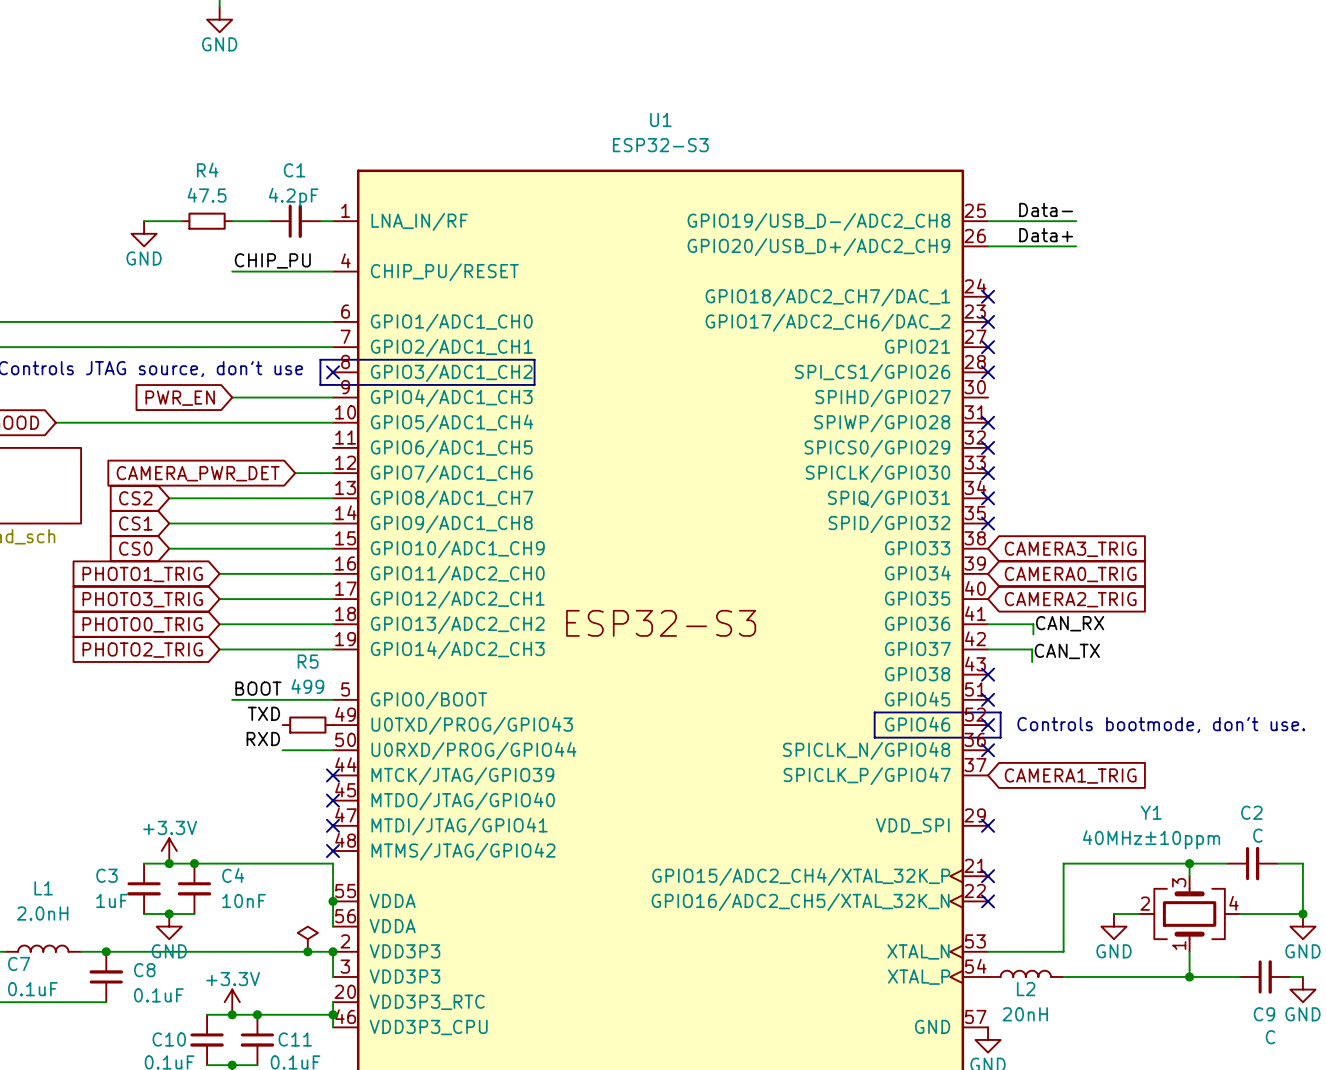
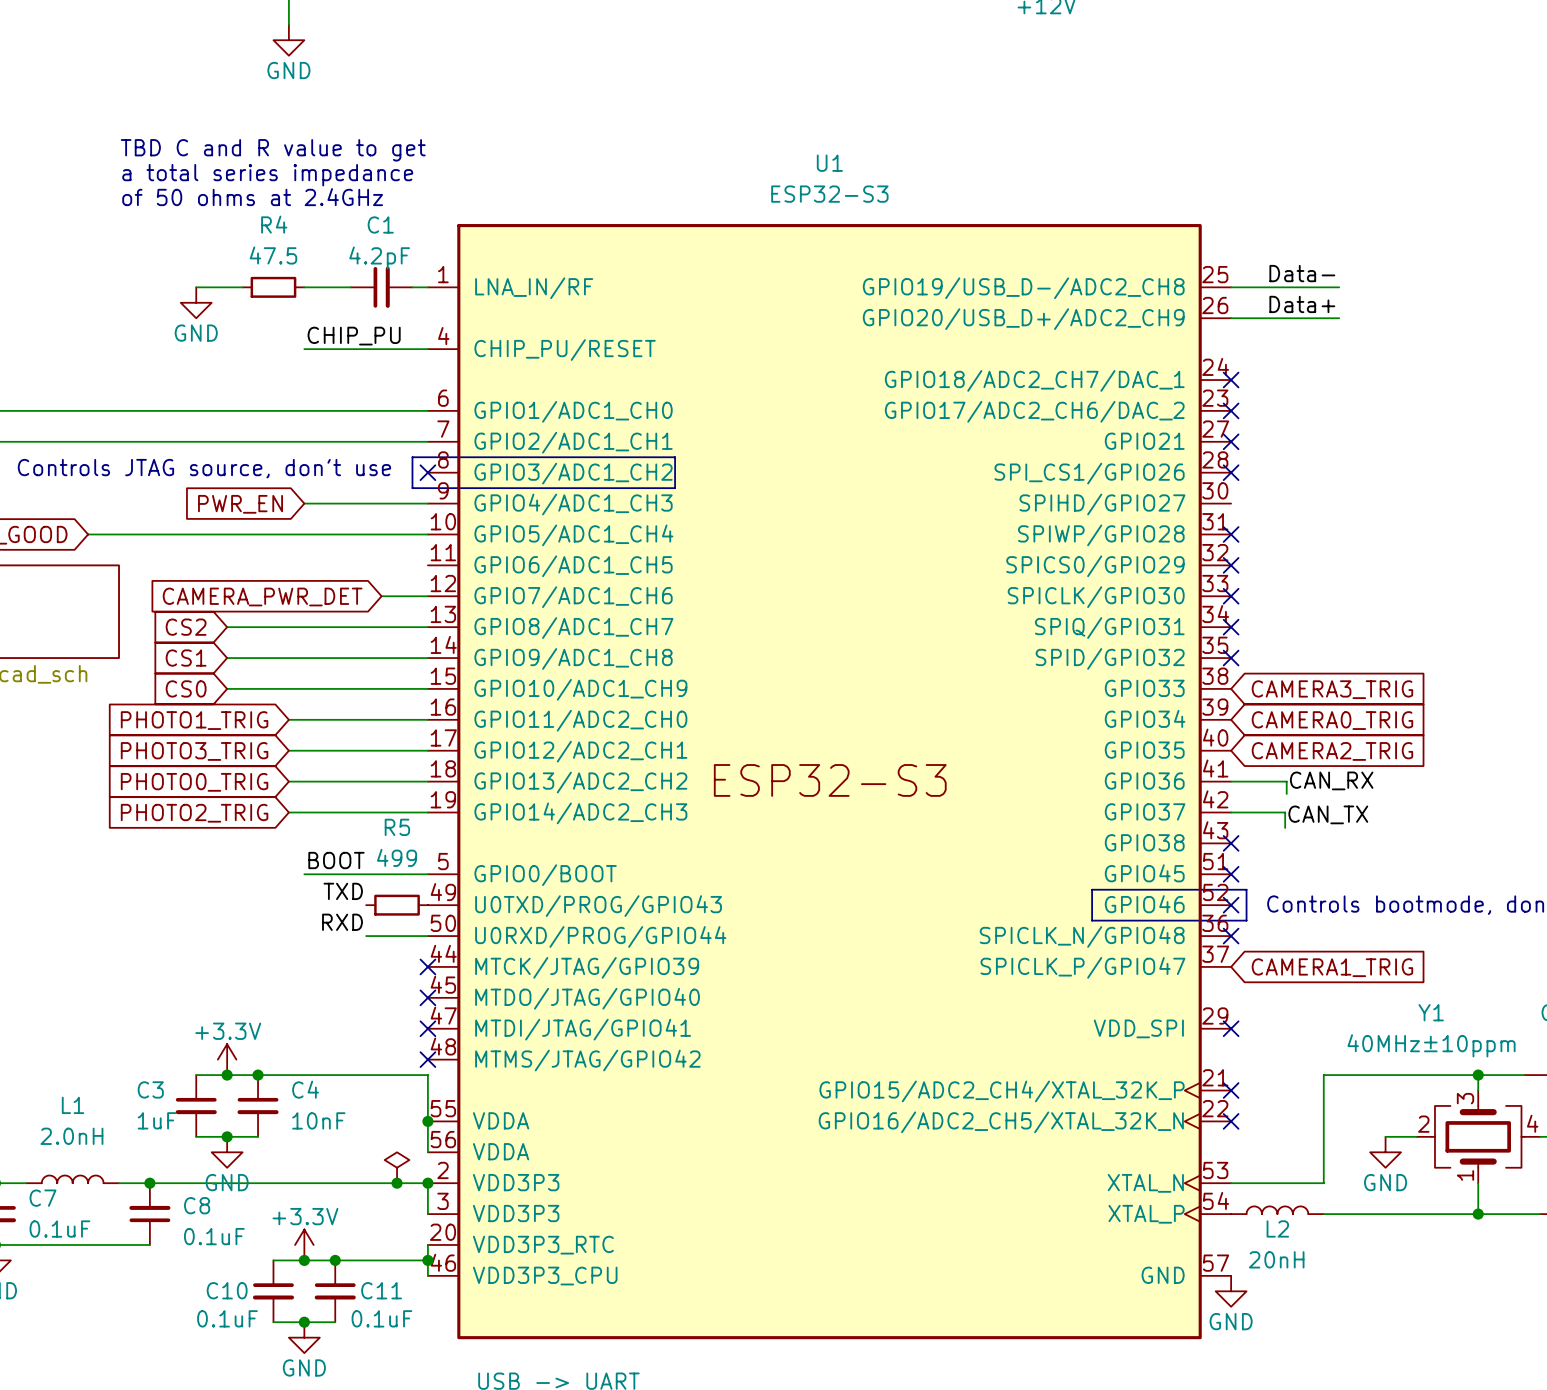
text: none -> TBD C and R value to get (273, 150)
text: none -> a total series impedance (267, 175)
text: none -> of 50 ohms at 2.4GHz (252, 197)

